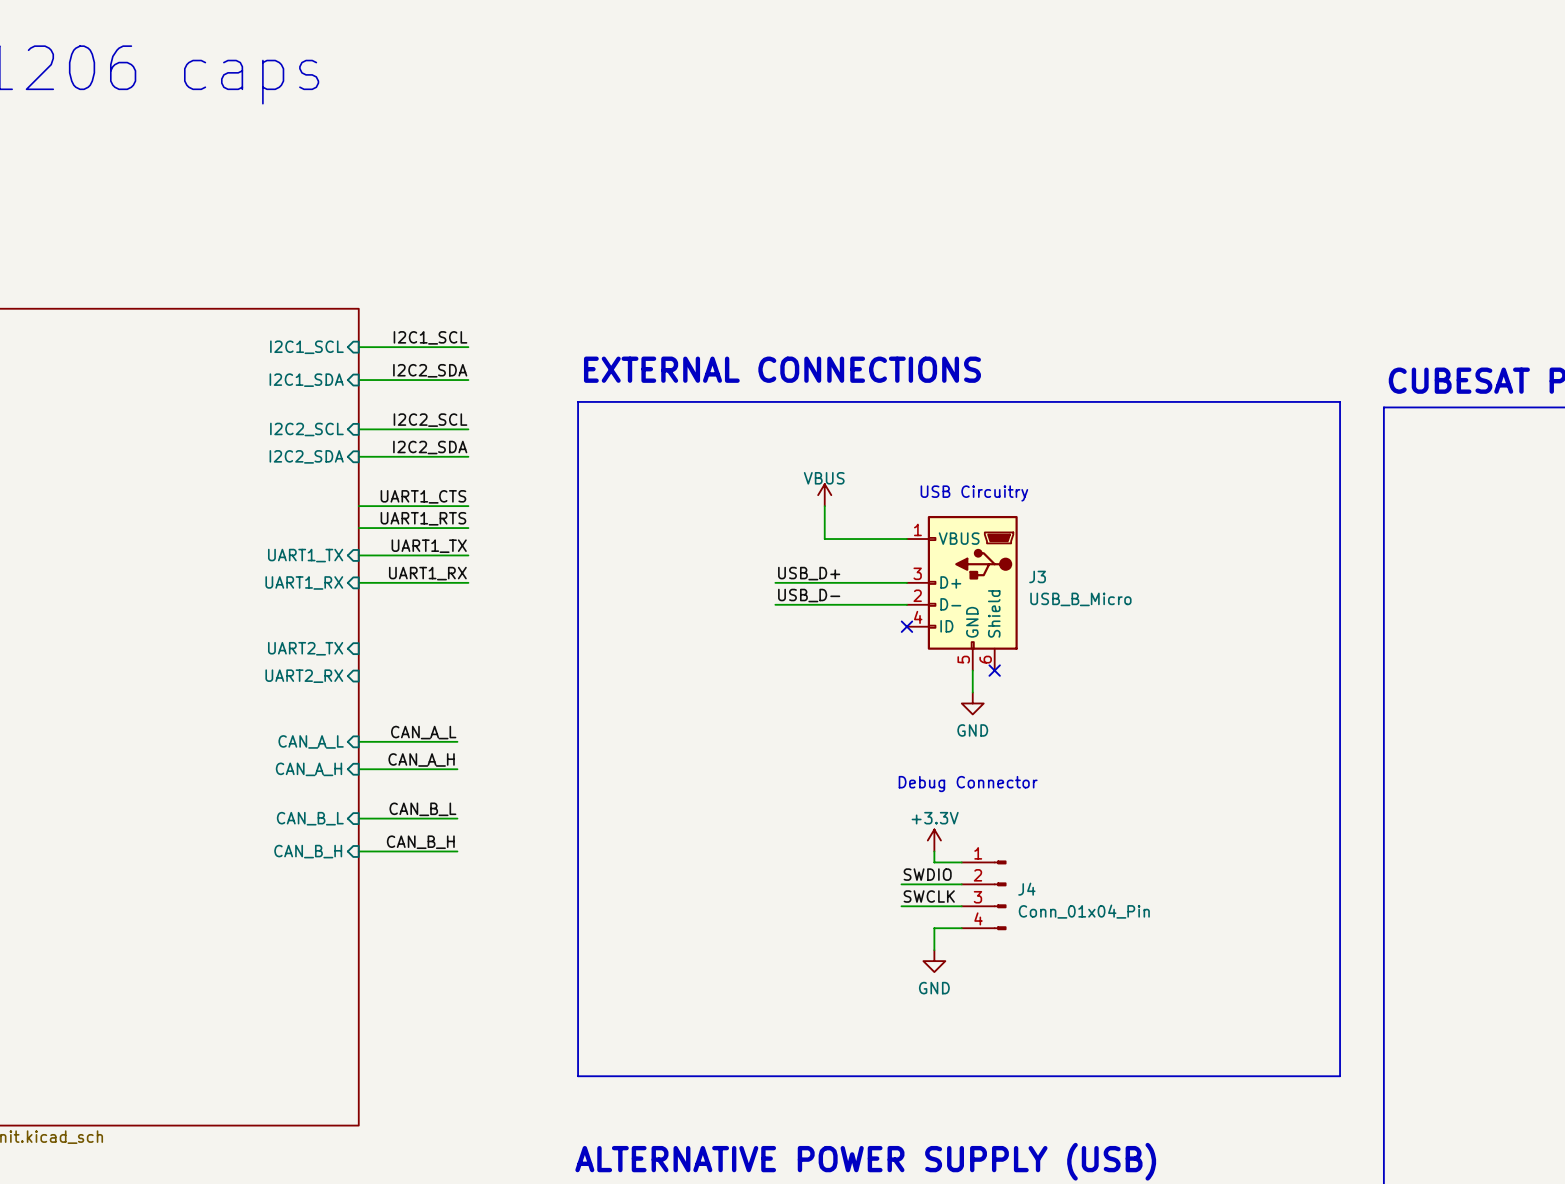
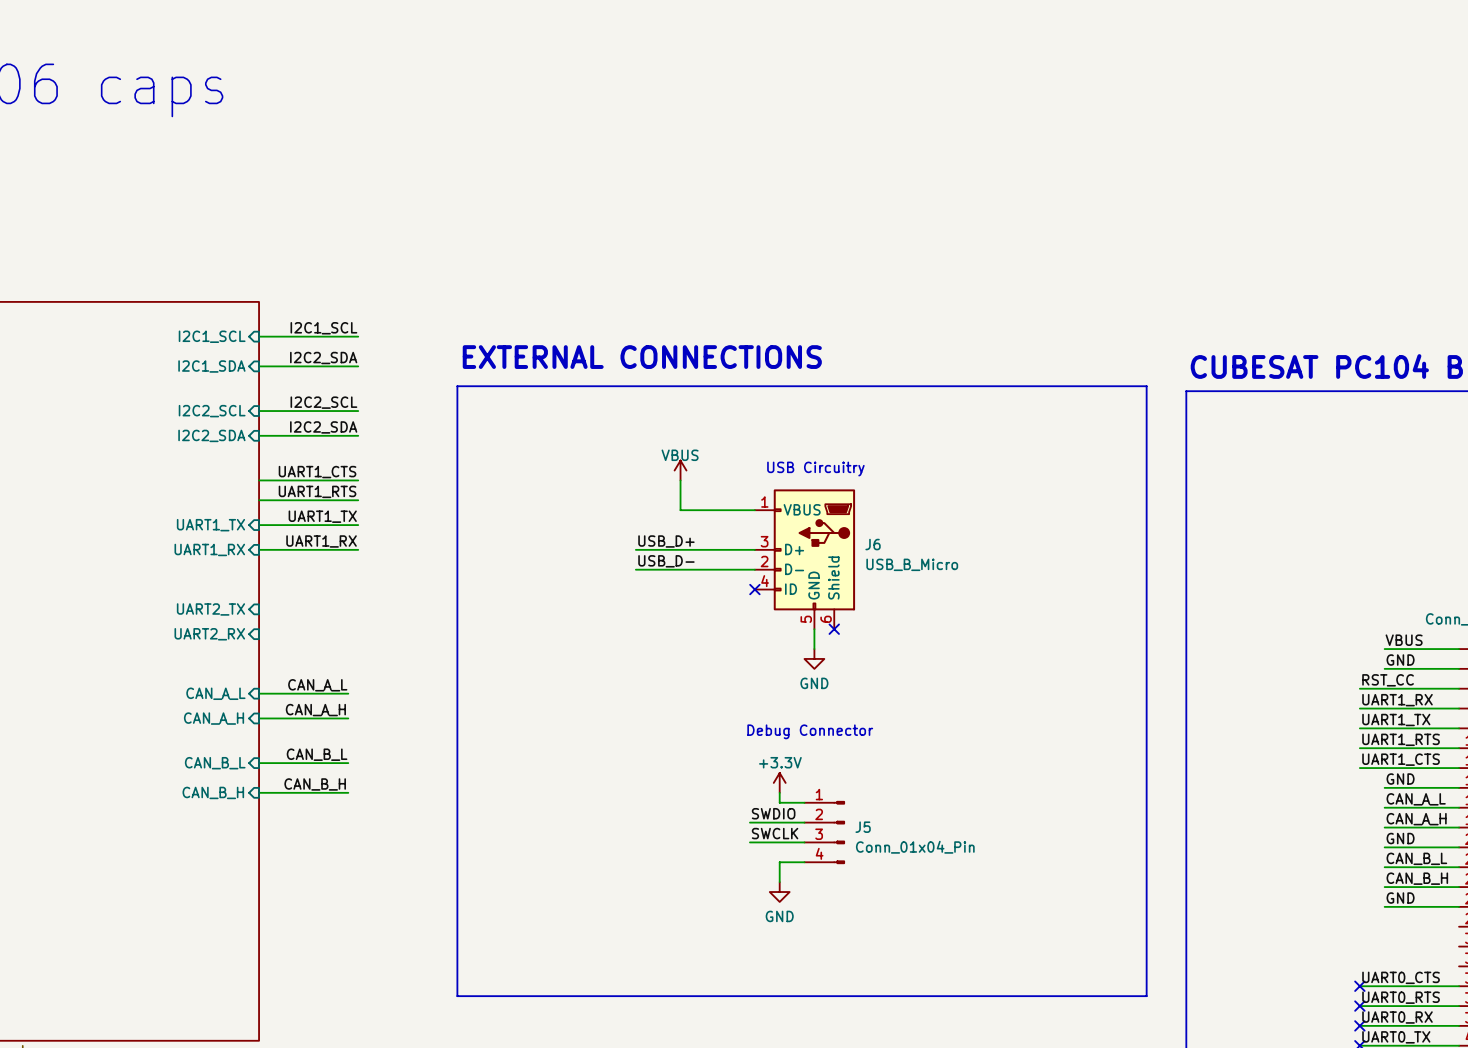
J3 name: J3 (1037, 576) -> J6 (873, 544)
J4 name: J4 (1026, 889) -> J5 (863, 827)

